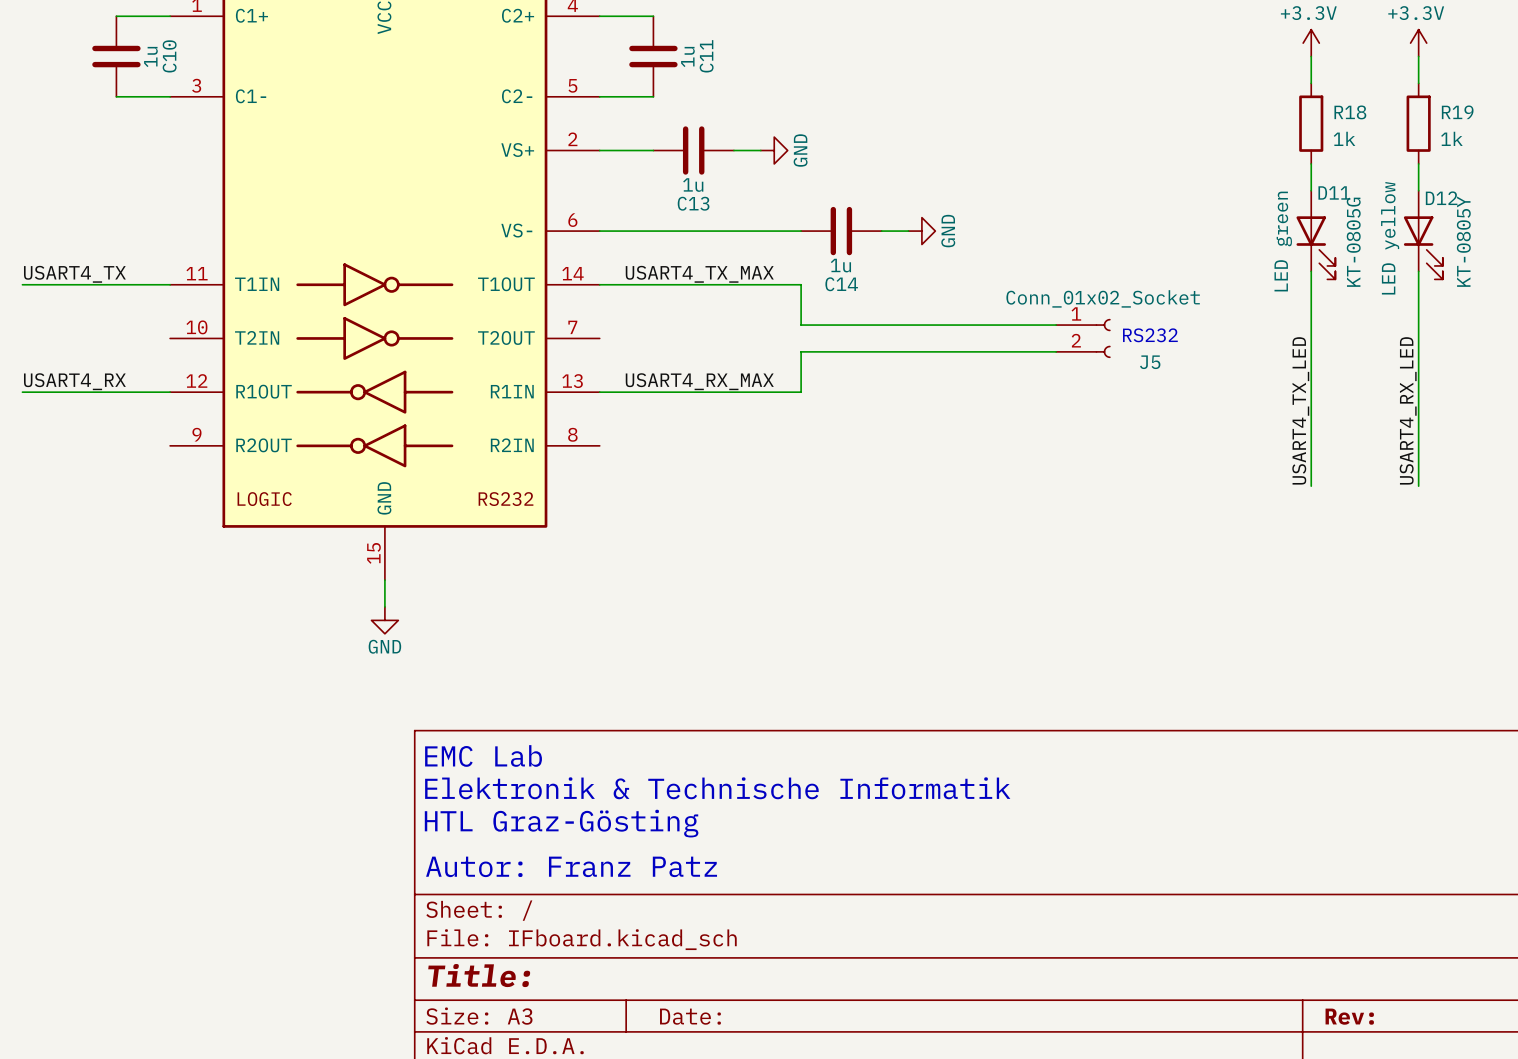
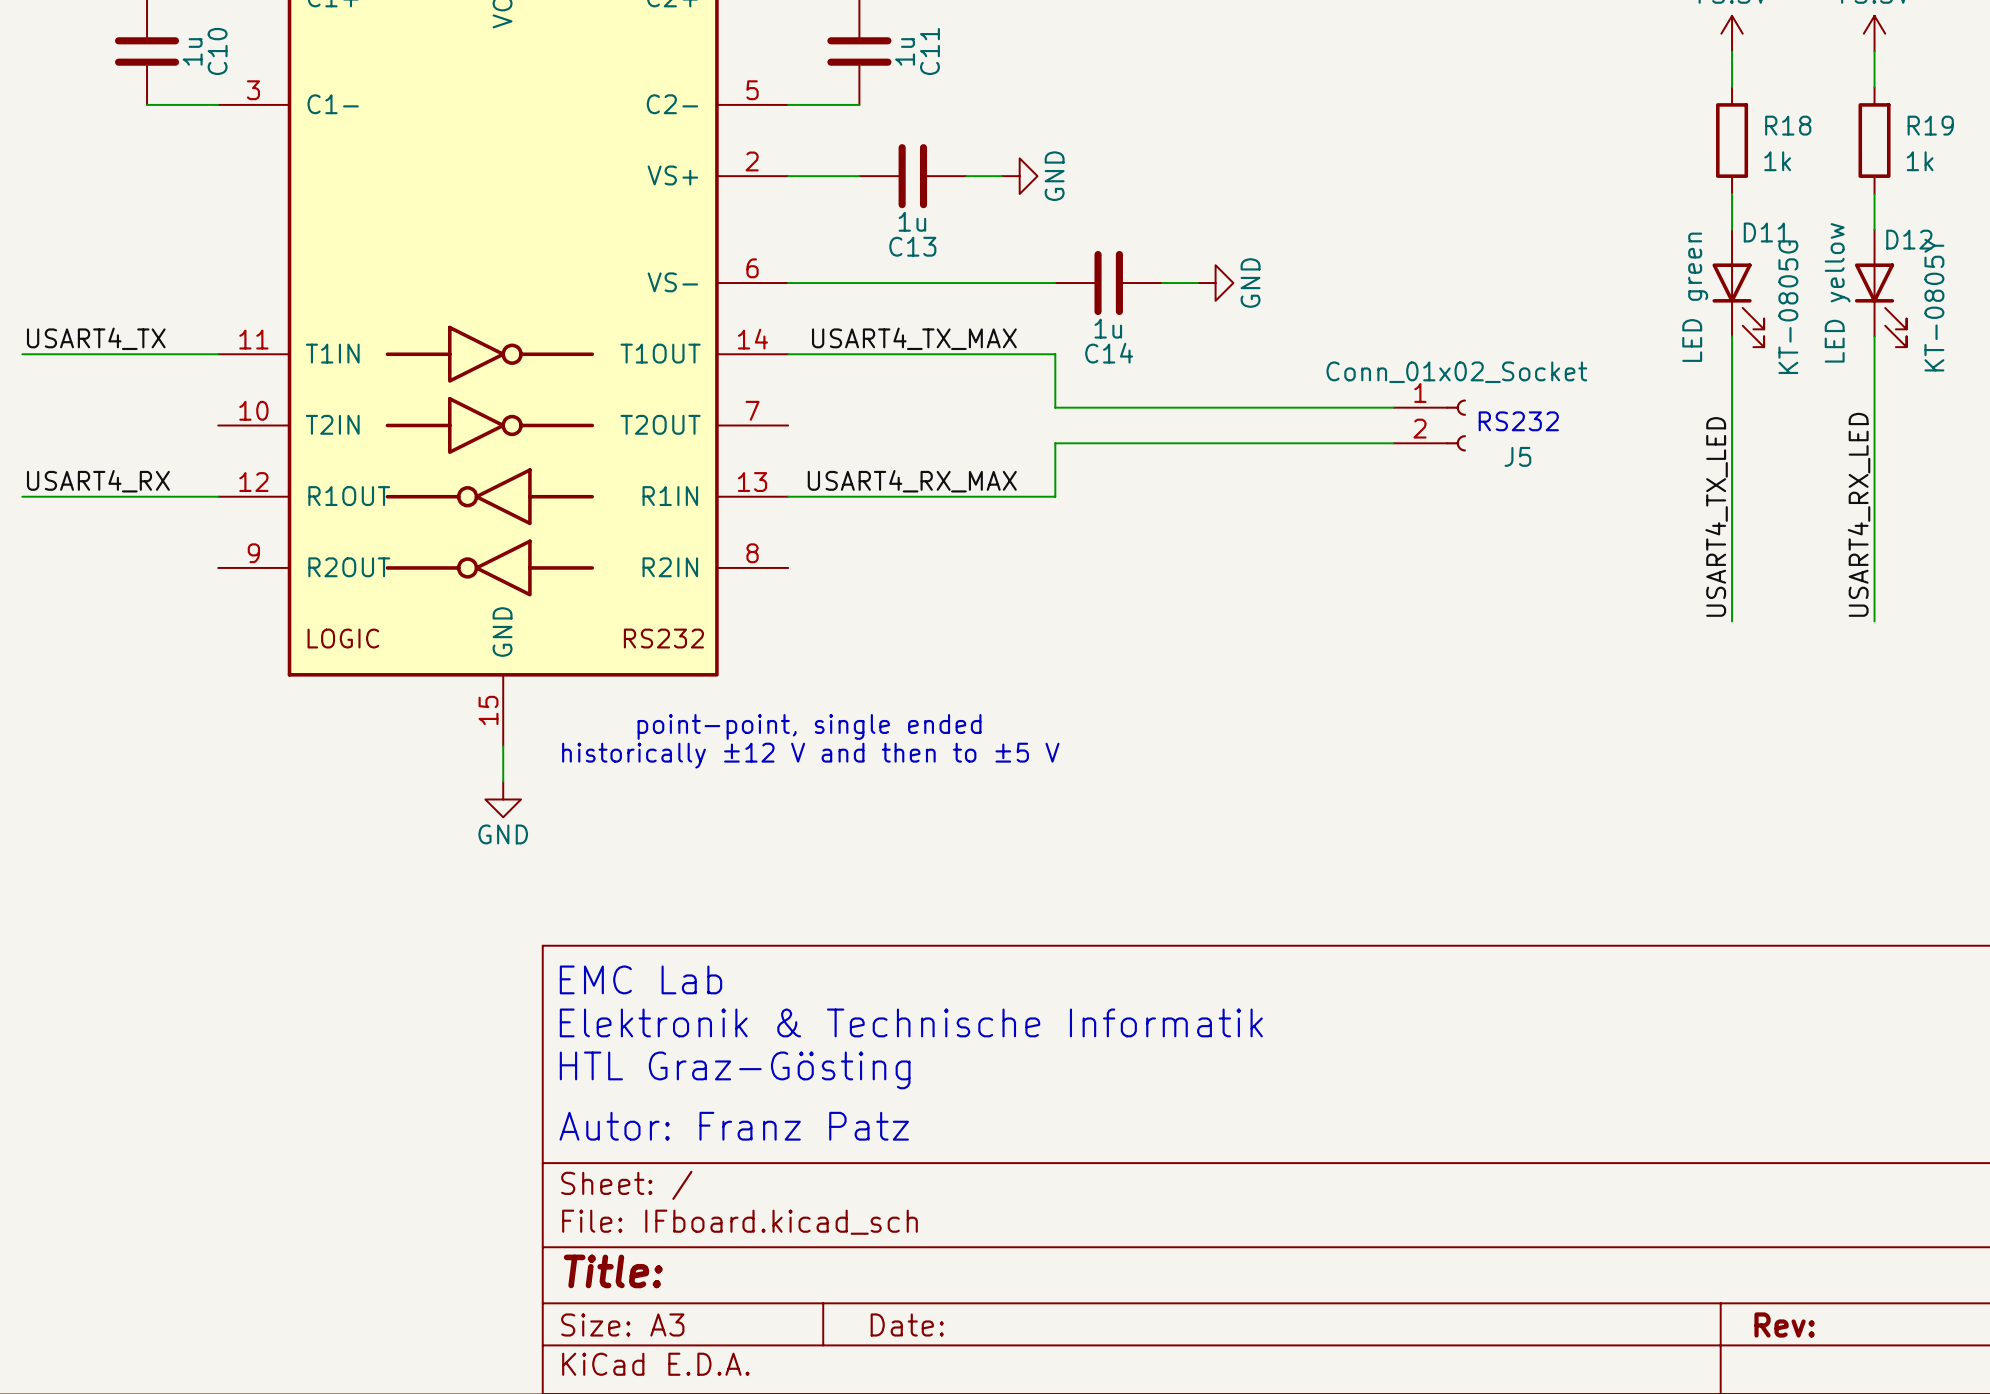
text: none -> point-point, single ended (809, 726)
text: none -> historically ±12 V and then to ±5 V (810, 755)

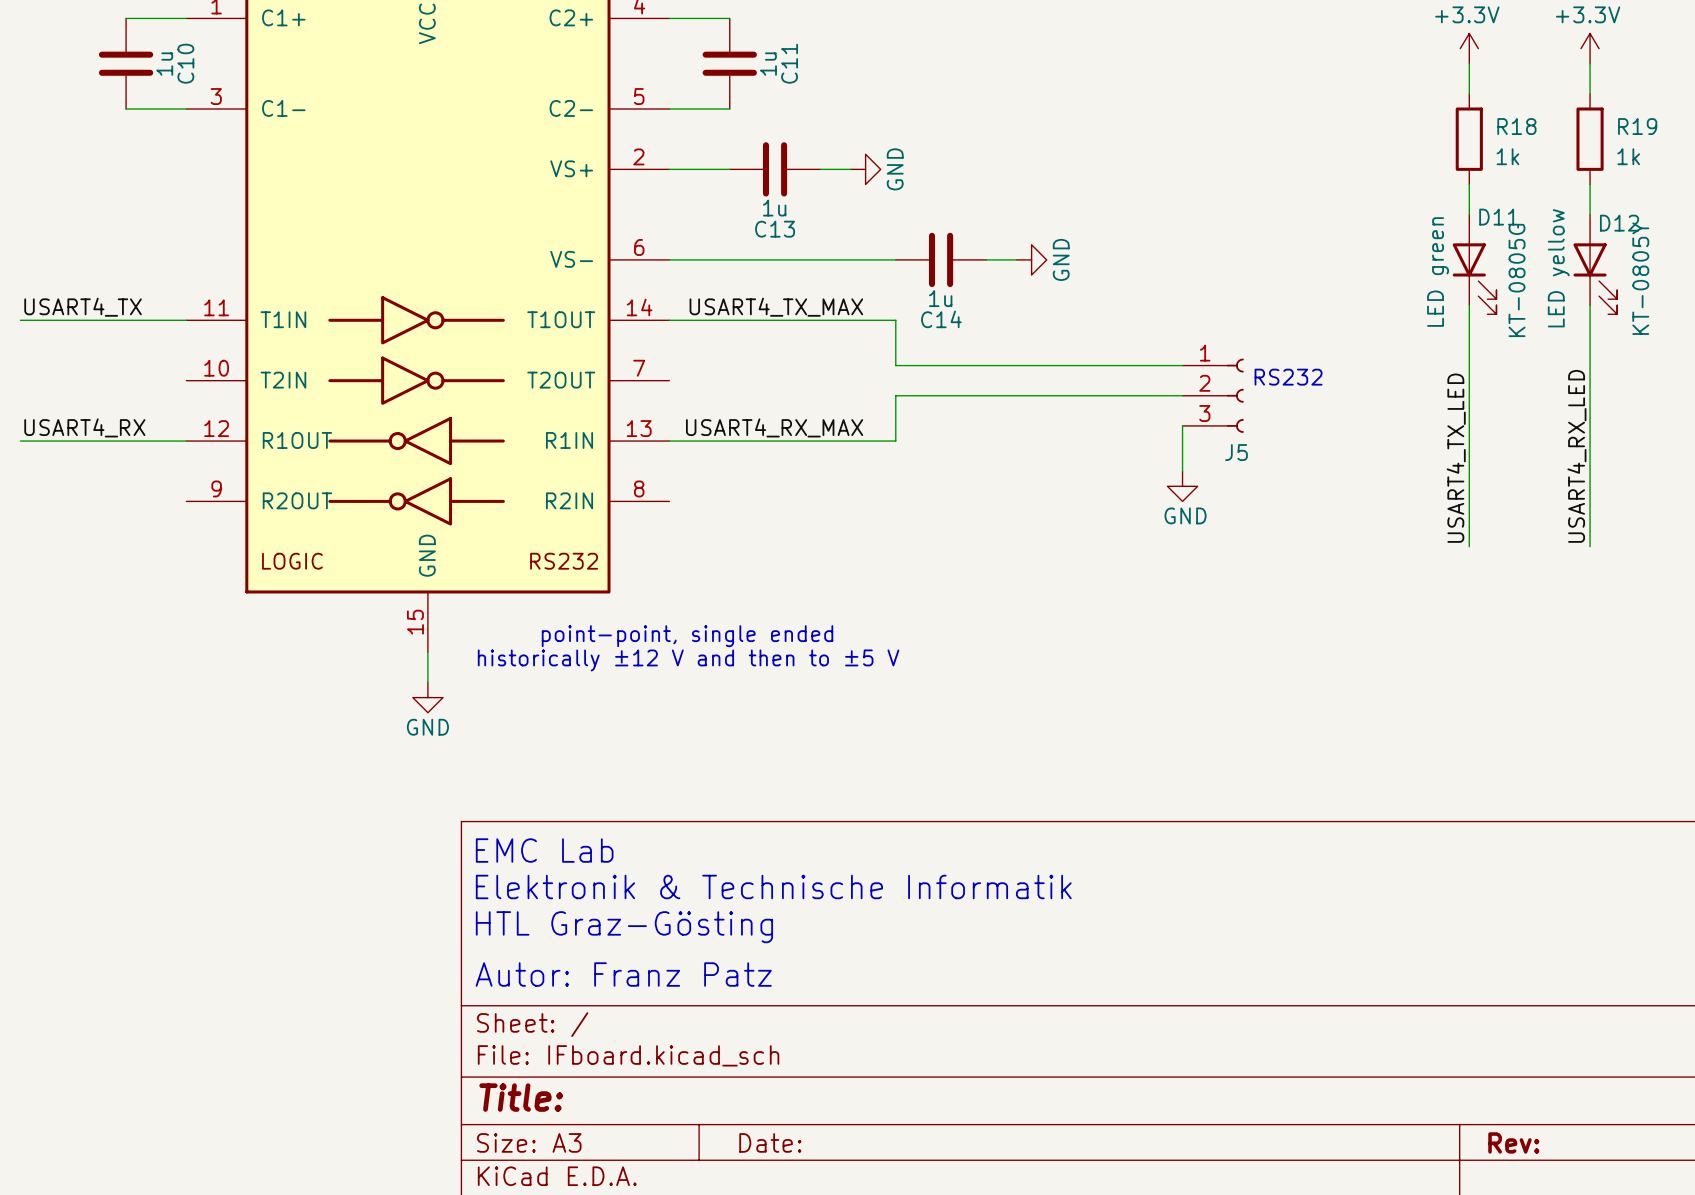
J5 value: Conn_01x02_Socket (1456, 372) -> none
J5 symbol: [1393, 399, 1466, 452] -> [1182, 358, 1244, 433]
J5 name position: J5 (1517, 456) -> J5 (1236, 452)
wire: none -> (1182, 425) (1182, 471)
power symbol: none -> GND (1182, 486)

